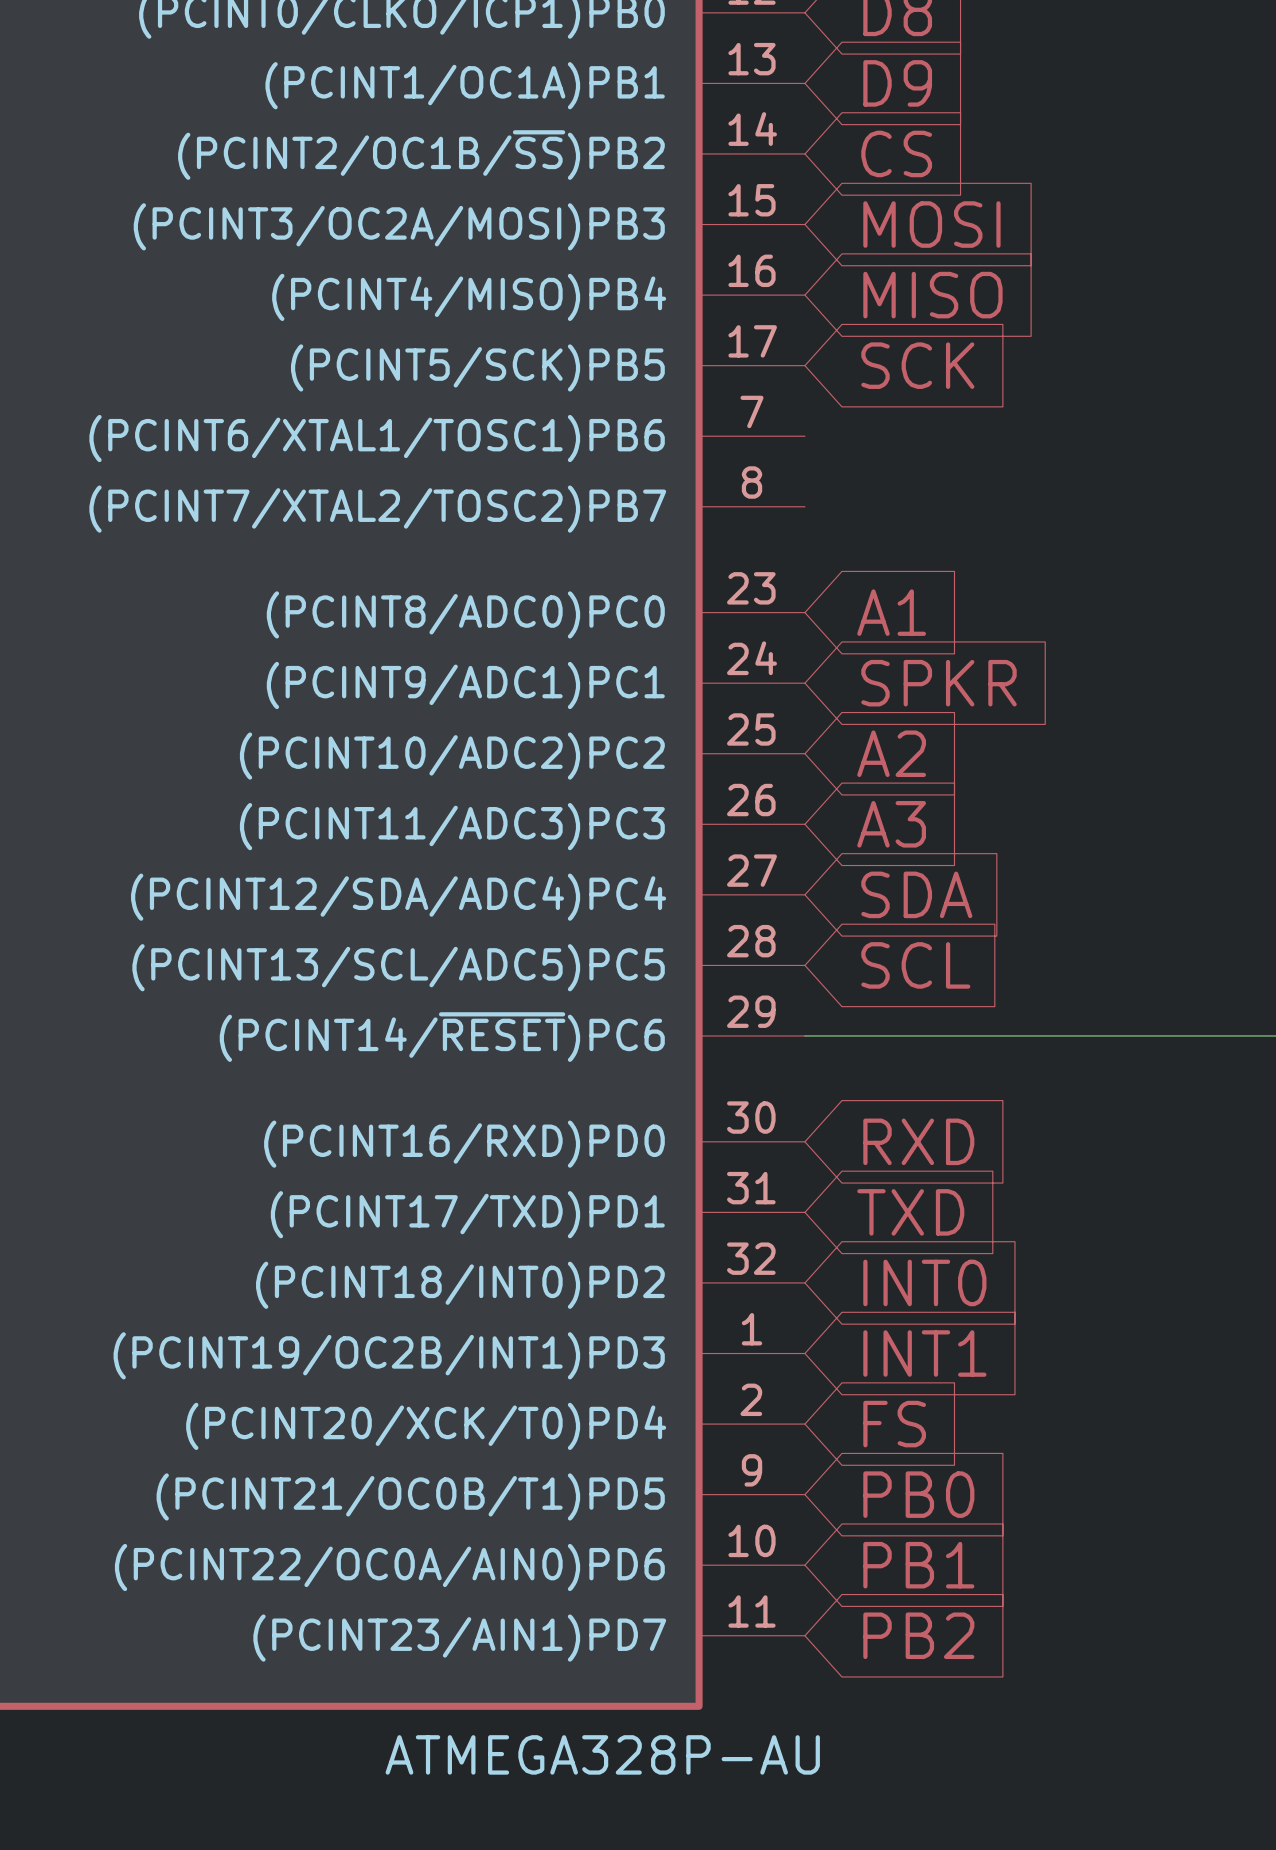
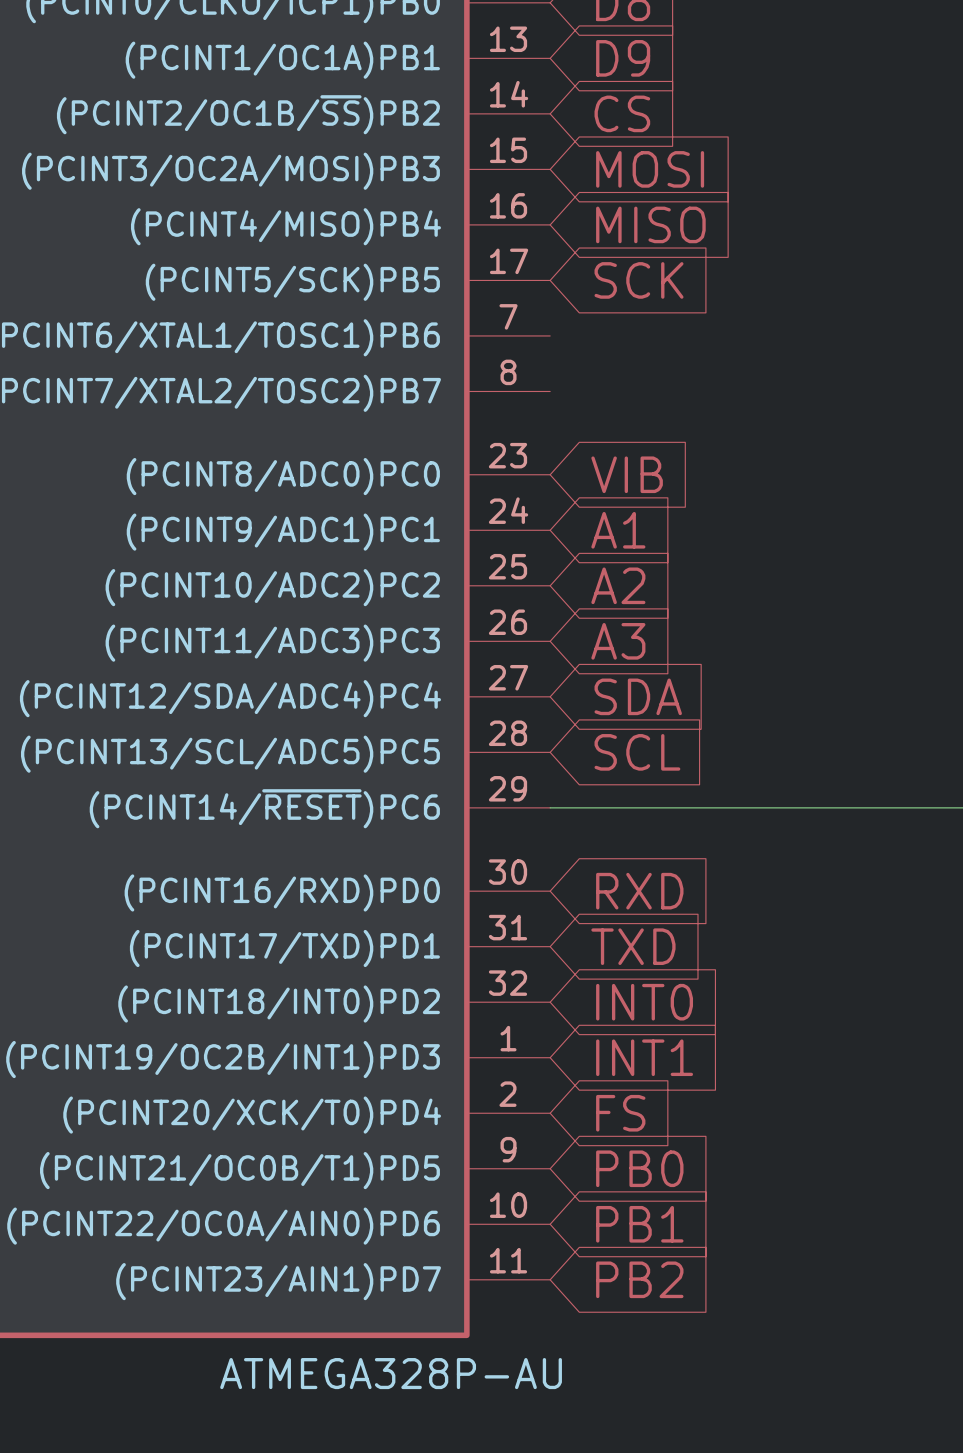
global label: A1 (891, 612) -> VIB (627, 474)
global label: SPKR (939, 683) -> A1 (618, 530)

